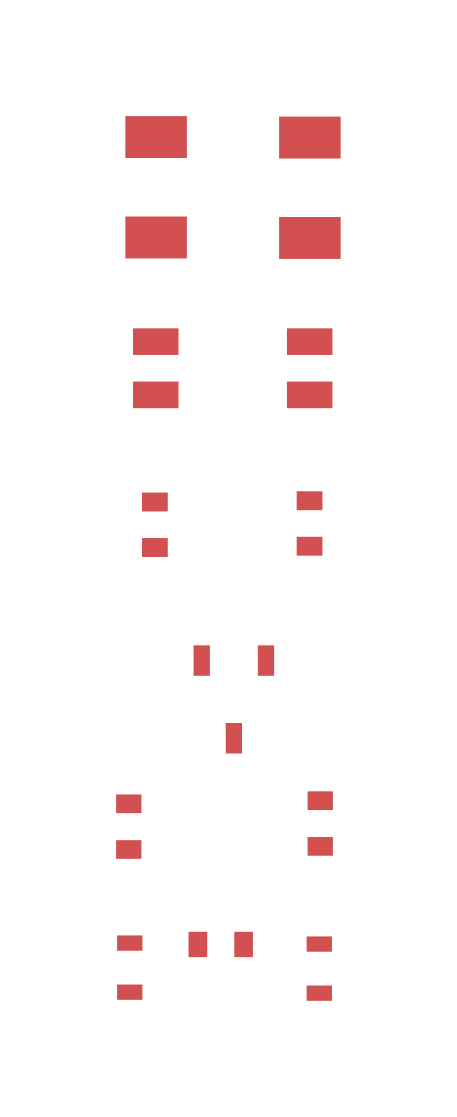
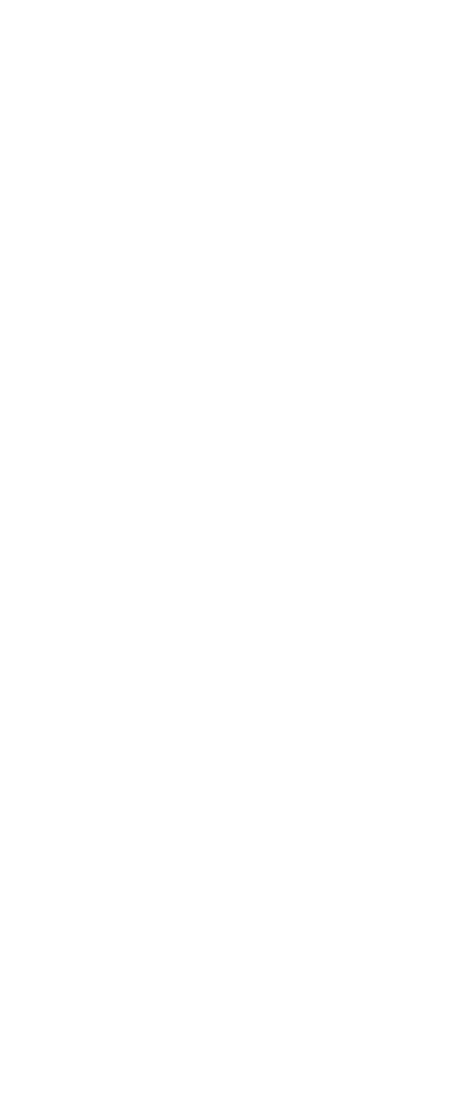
part: (156, 187) -> none
part: (309, 187) -> none
part: (155, 368) -> none
part: (309, 368) -> none
part: (309, 523) -> none
part: (154, 524) -> none
part: (233, 699) -> none
part: (320, 823) -> none
part: (128, 826) -> none
part: (220, 944) -> none
part: (129, 967) -> none
part: (319, 968) -> none

